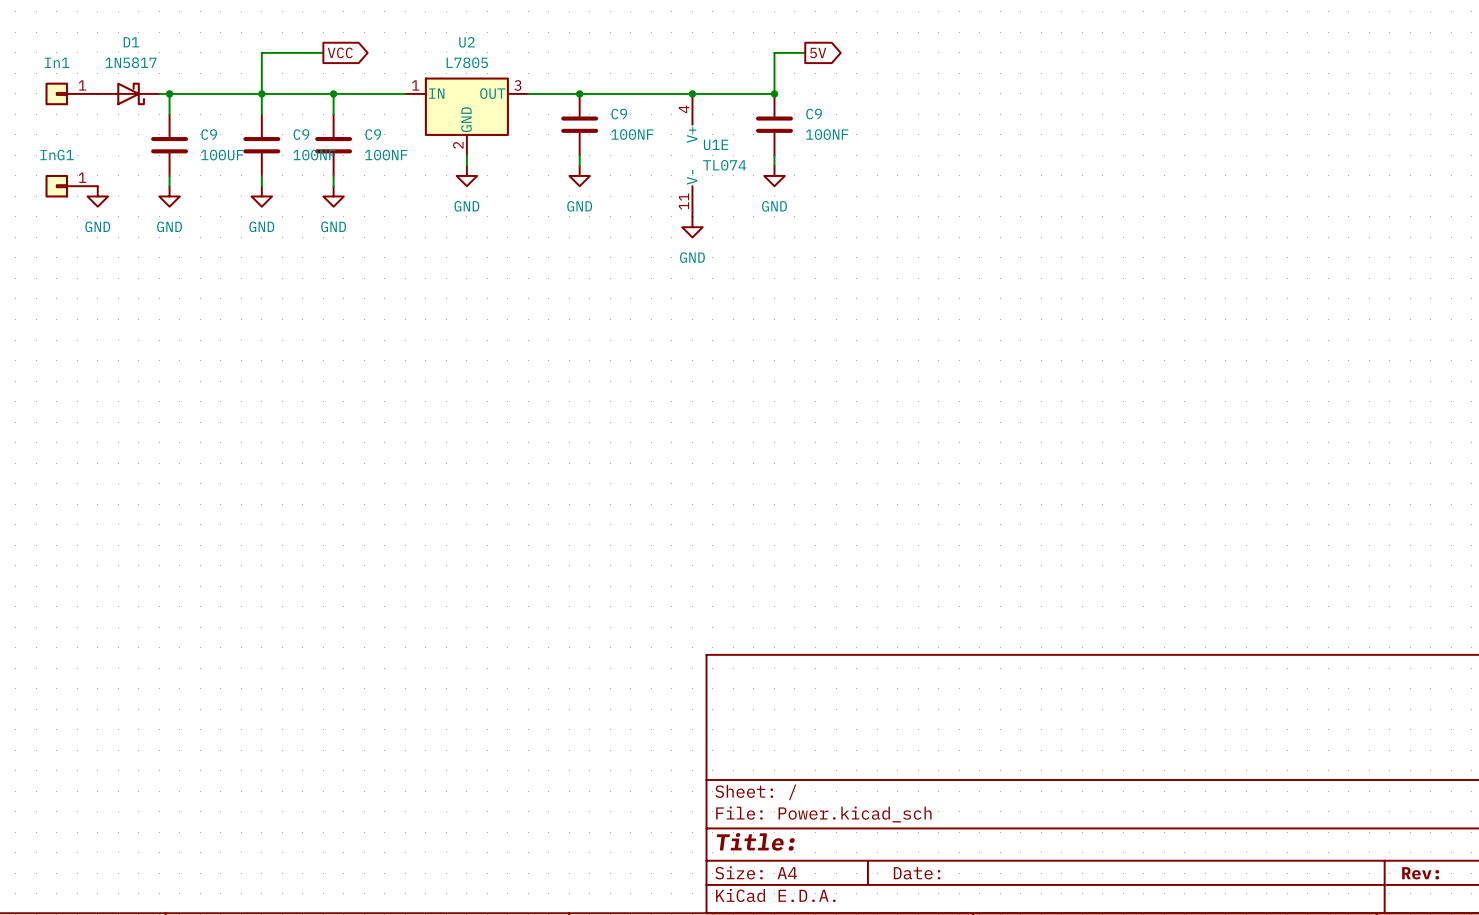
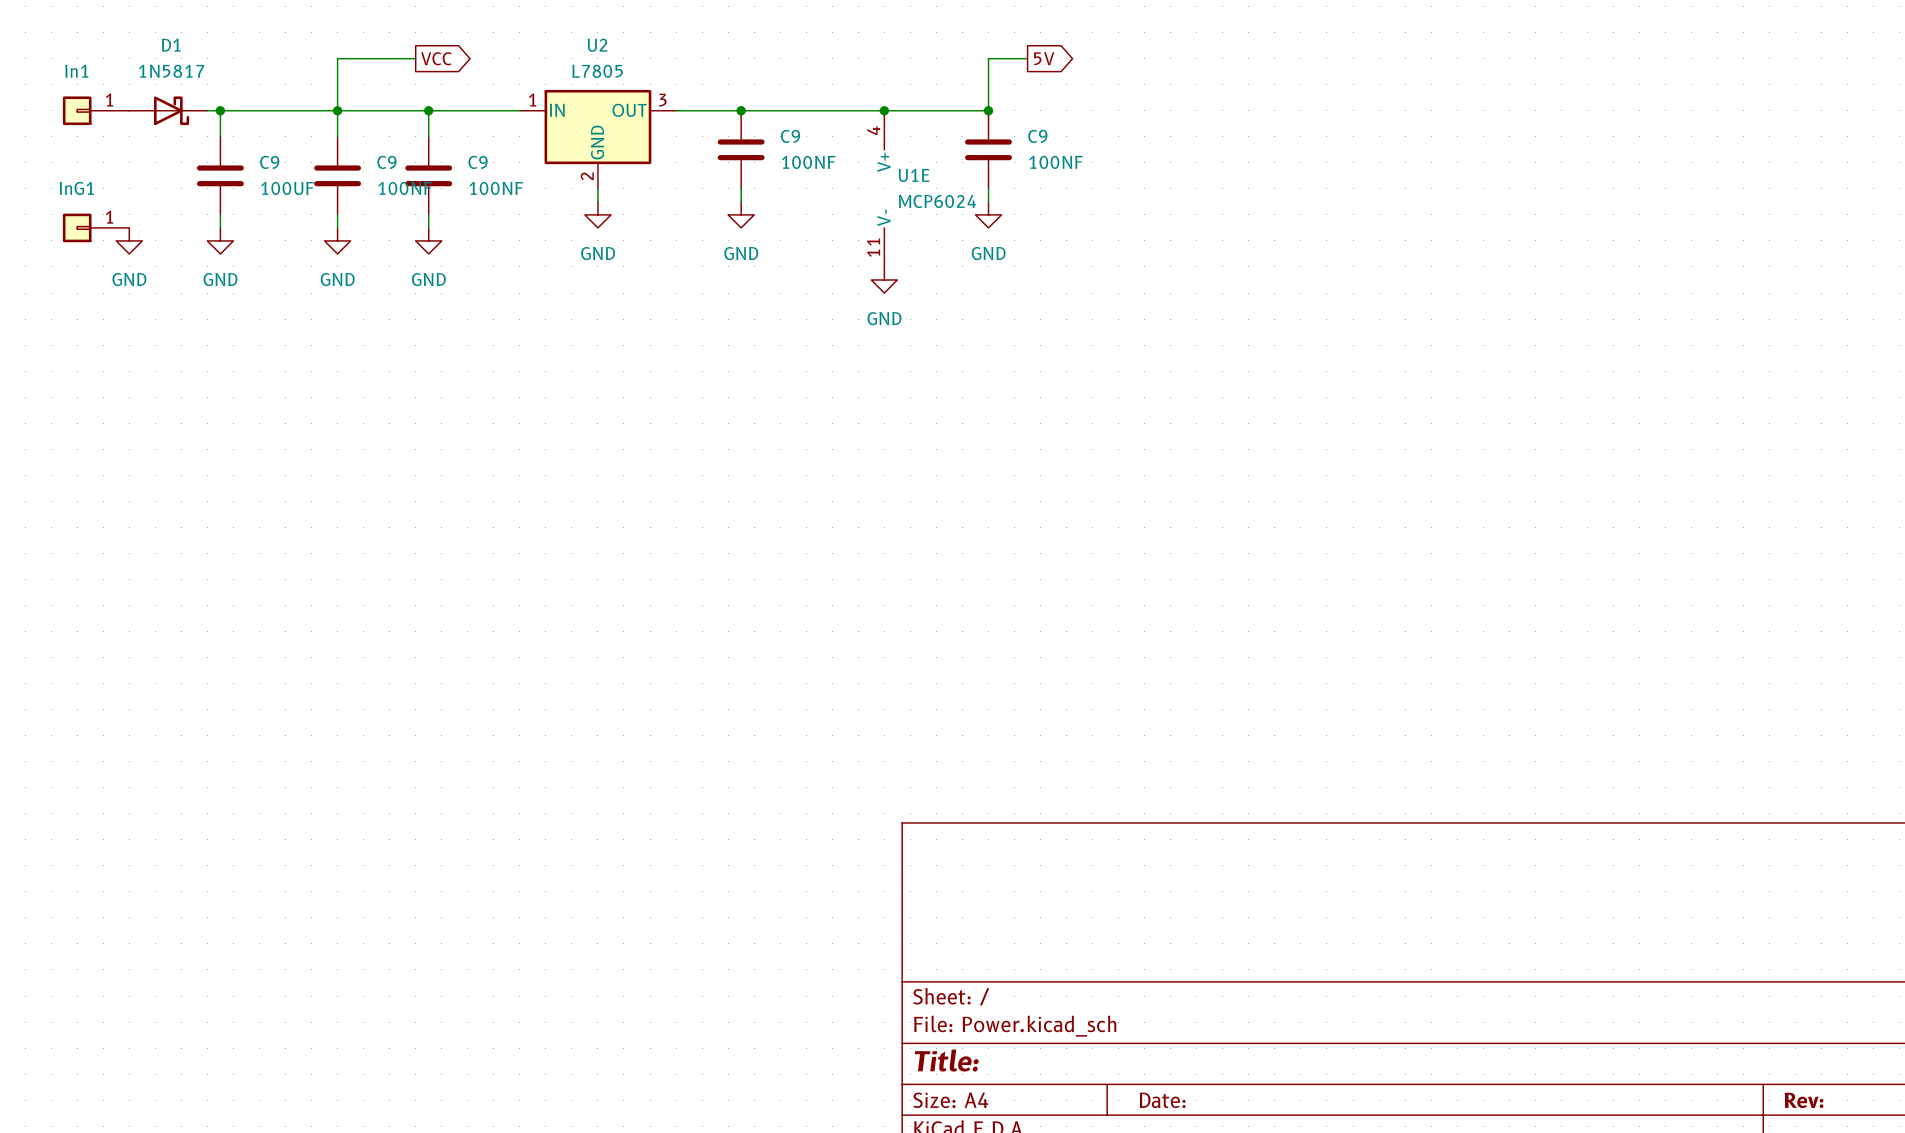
U1E value: TL074 (724, 165) -> MCP6024 (937, 201)

